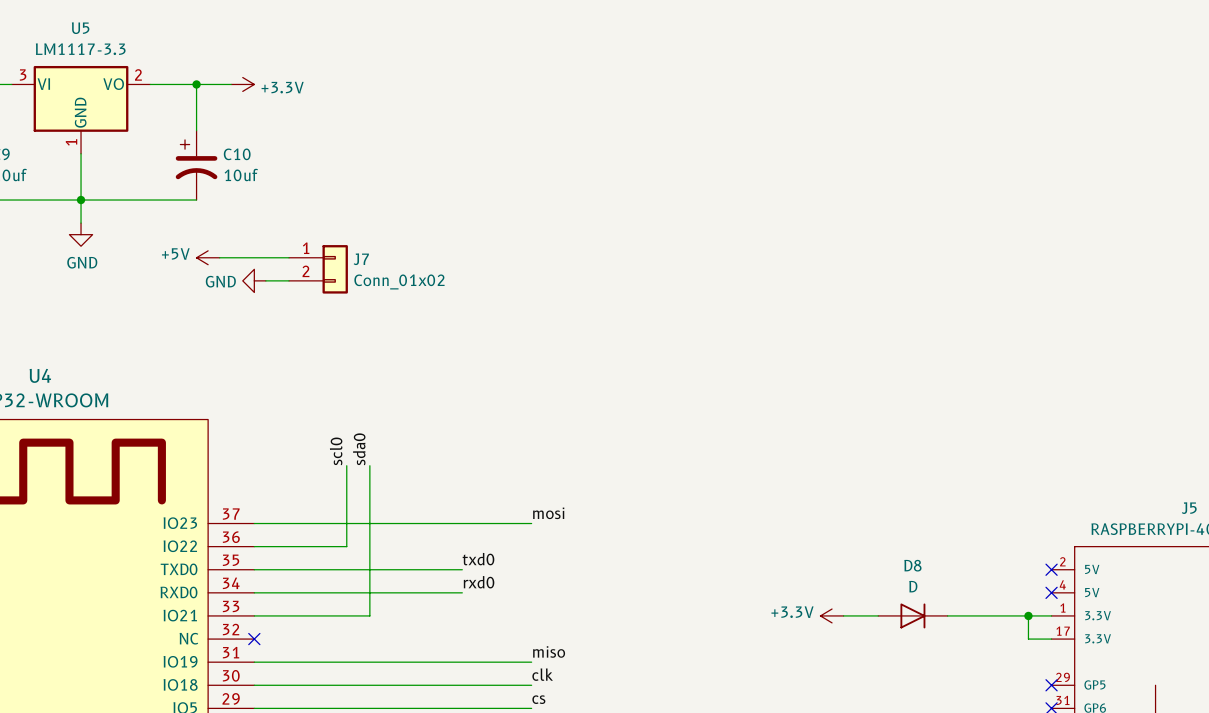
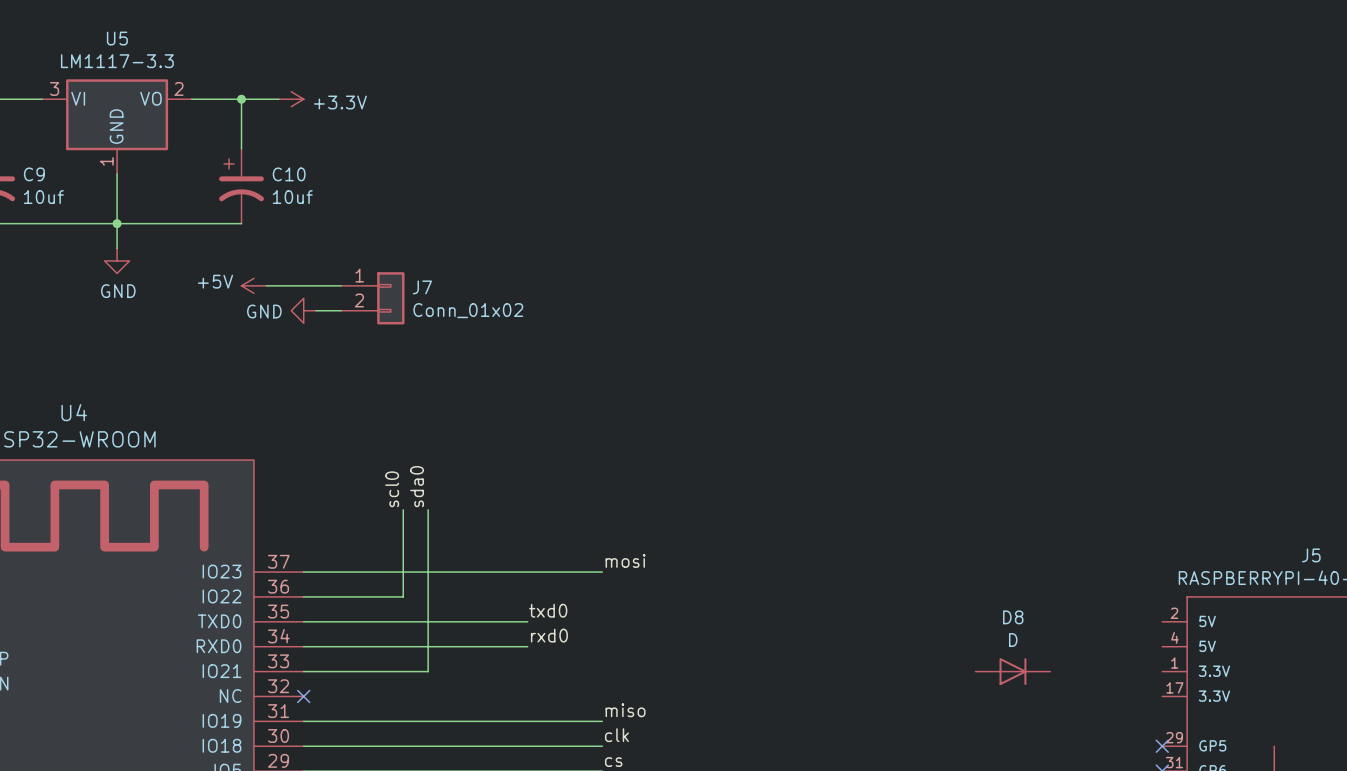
no-connect mark: (1051, 569) -> none
no-connect mark: (1051, 592) -> none
power symbol: +3.3V (832, 615) -> none
wire: (843, 615) (878, 615) -> none
wire: (947, 615) (1051, 615) -> none
wire: (1028, 615) (1028, 639) (1051, 639) -> none
junction: (1028, 615) -> none

